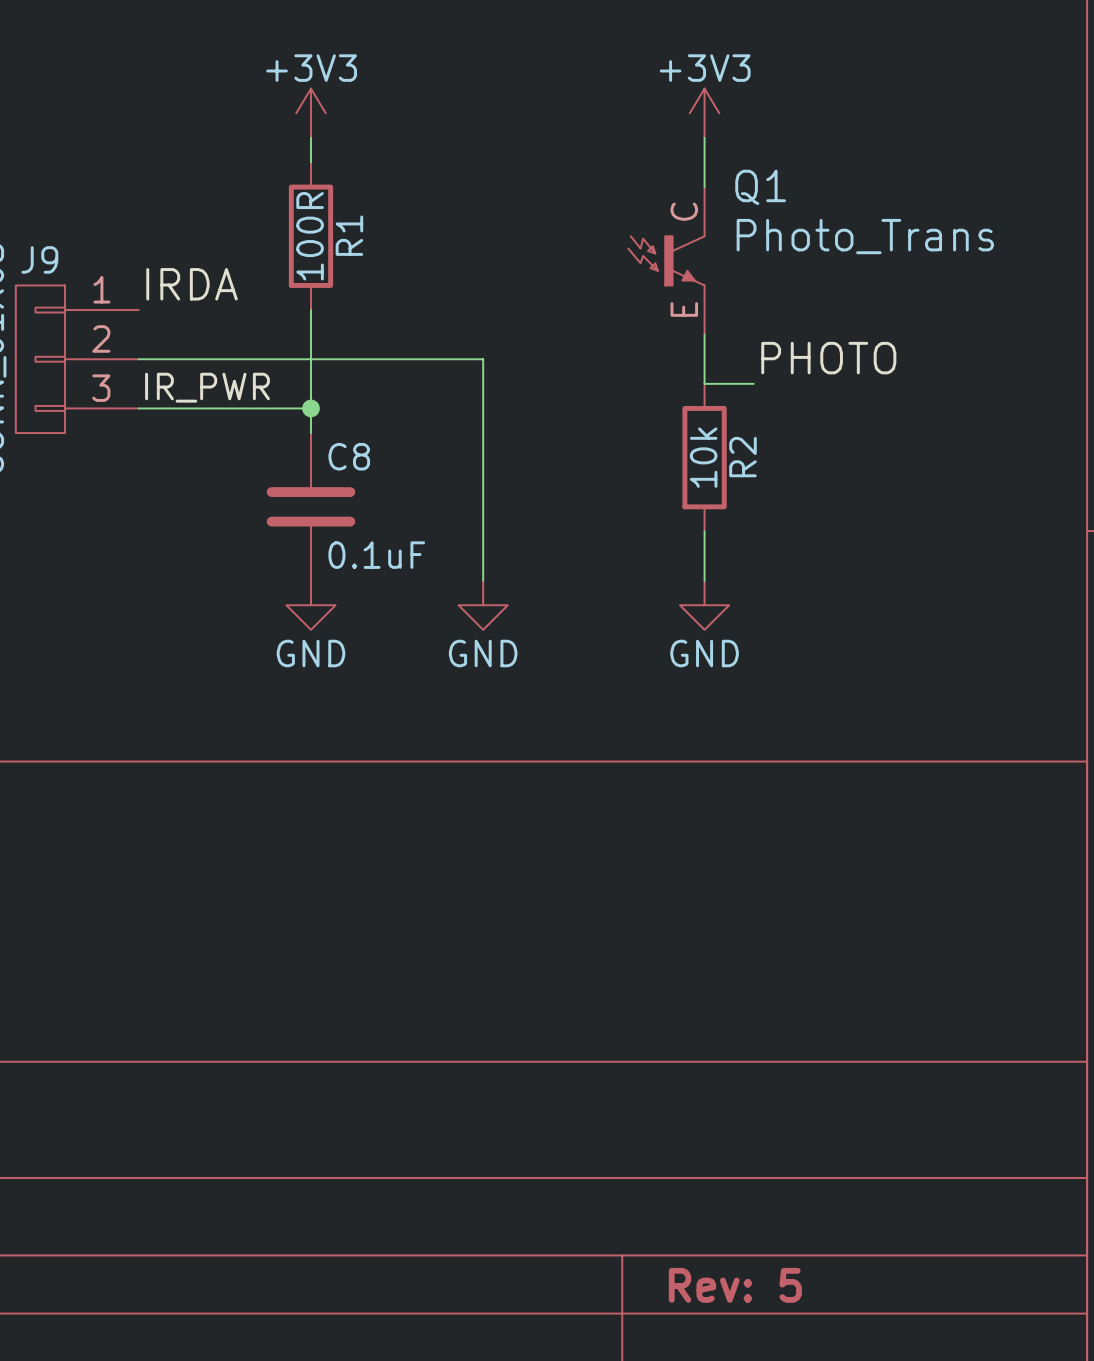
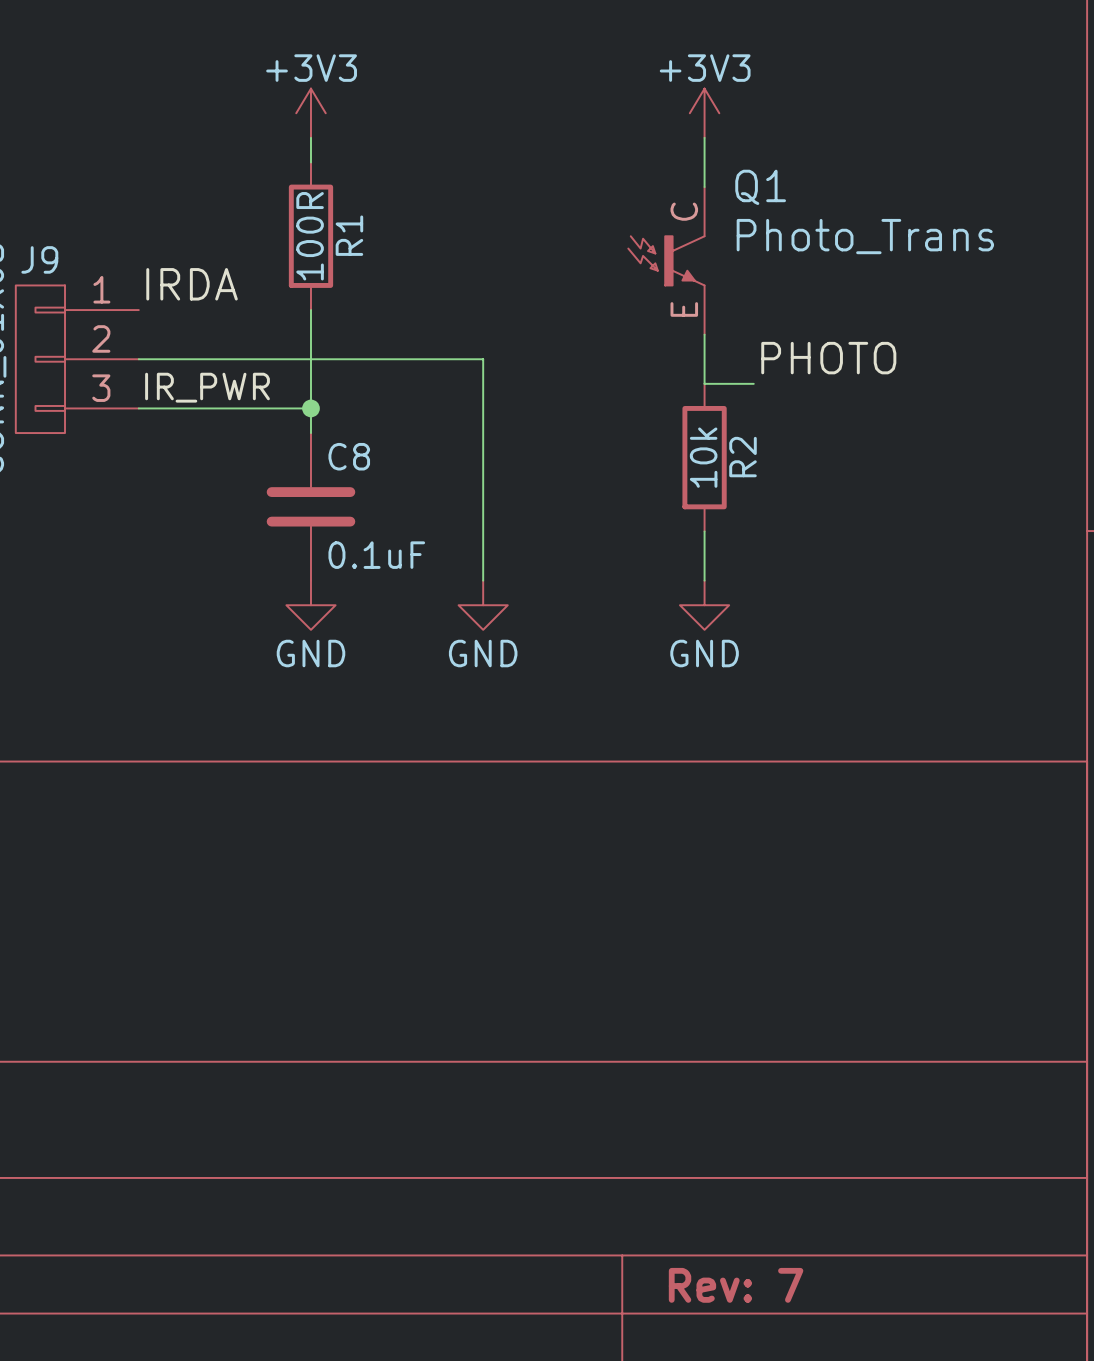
title block: Rev: 5 (735, 1285) -> Rev: 7 (736, 1285)

